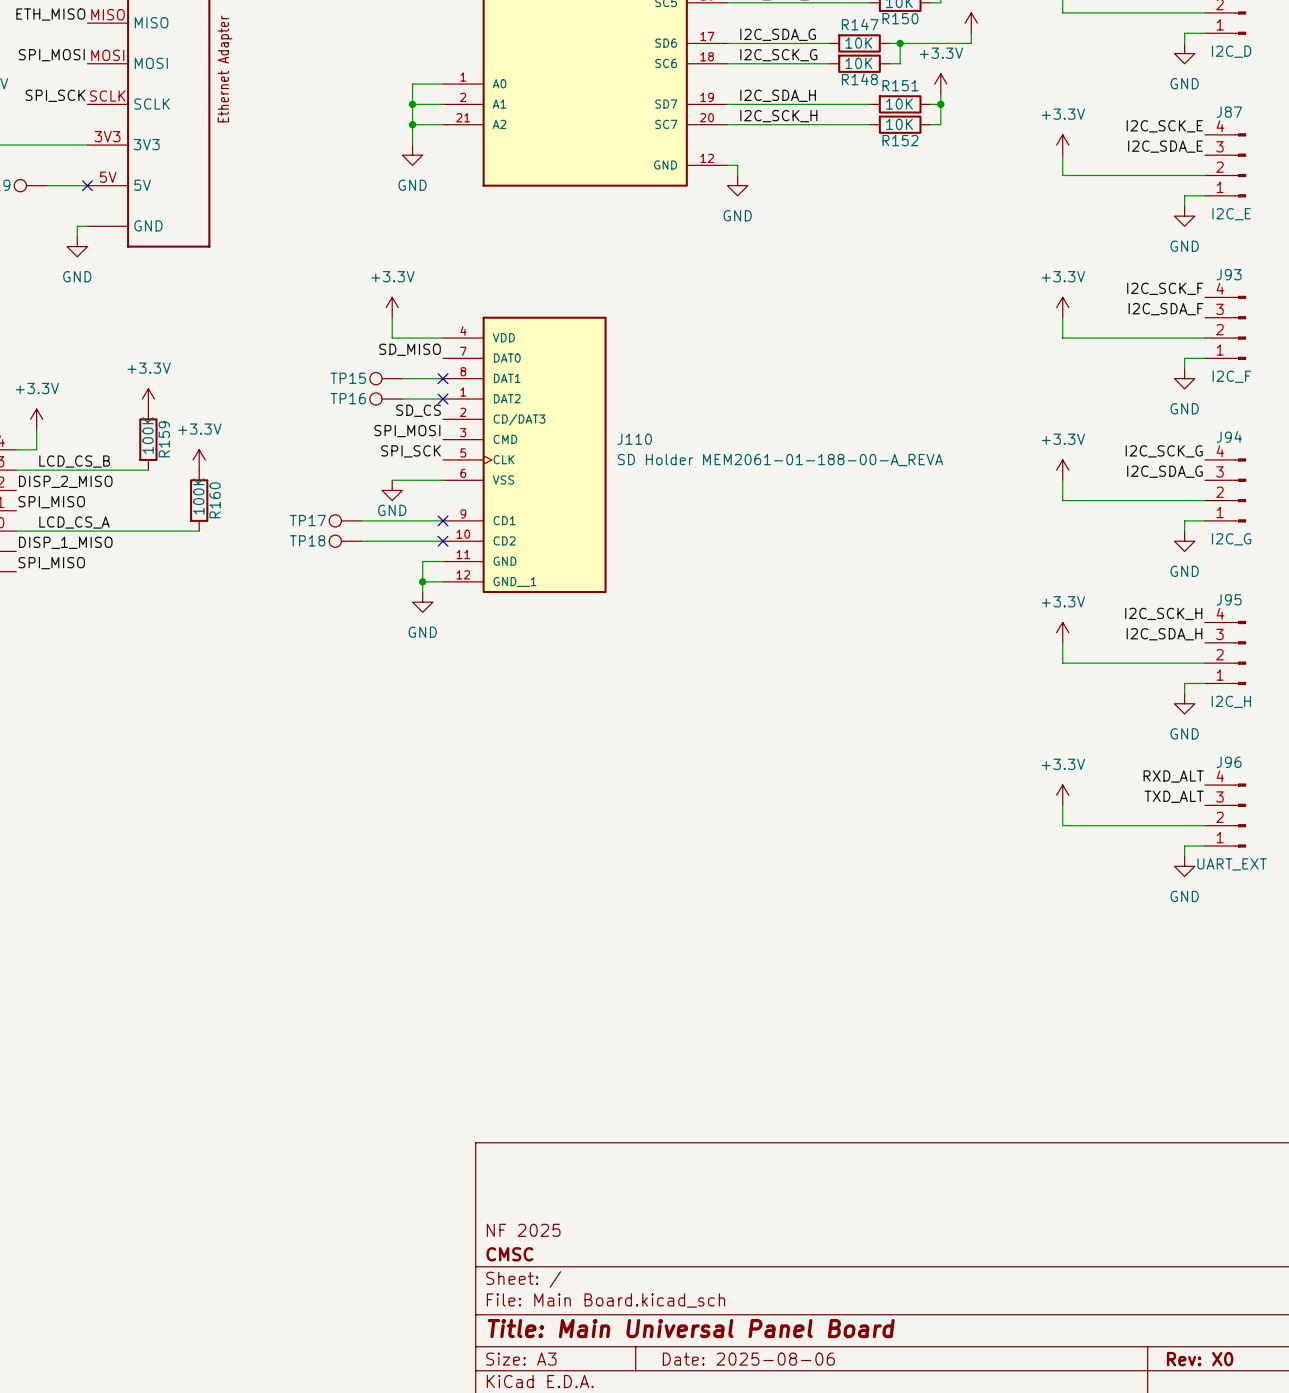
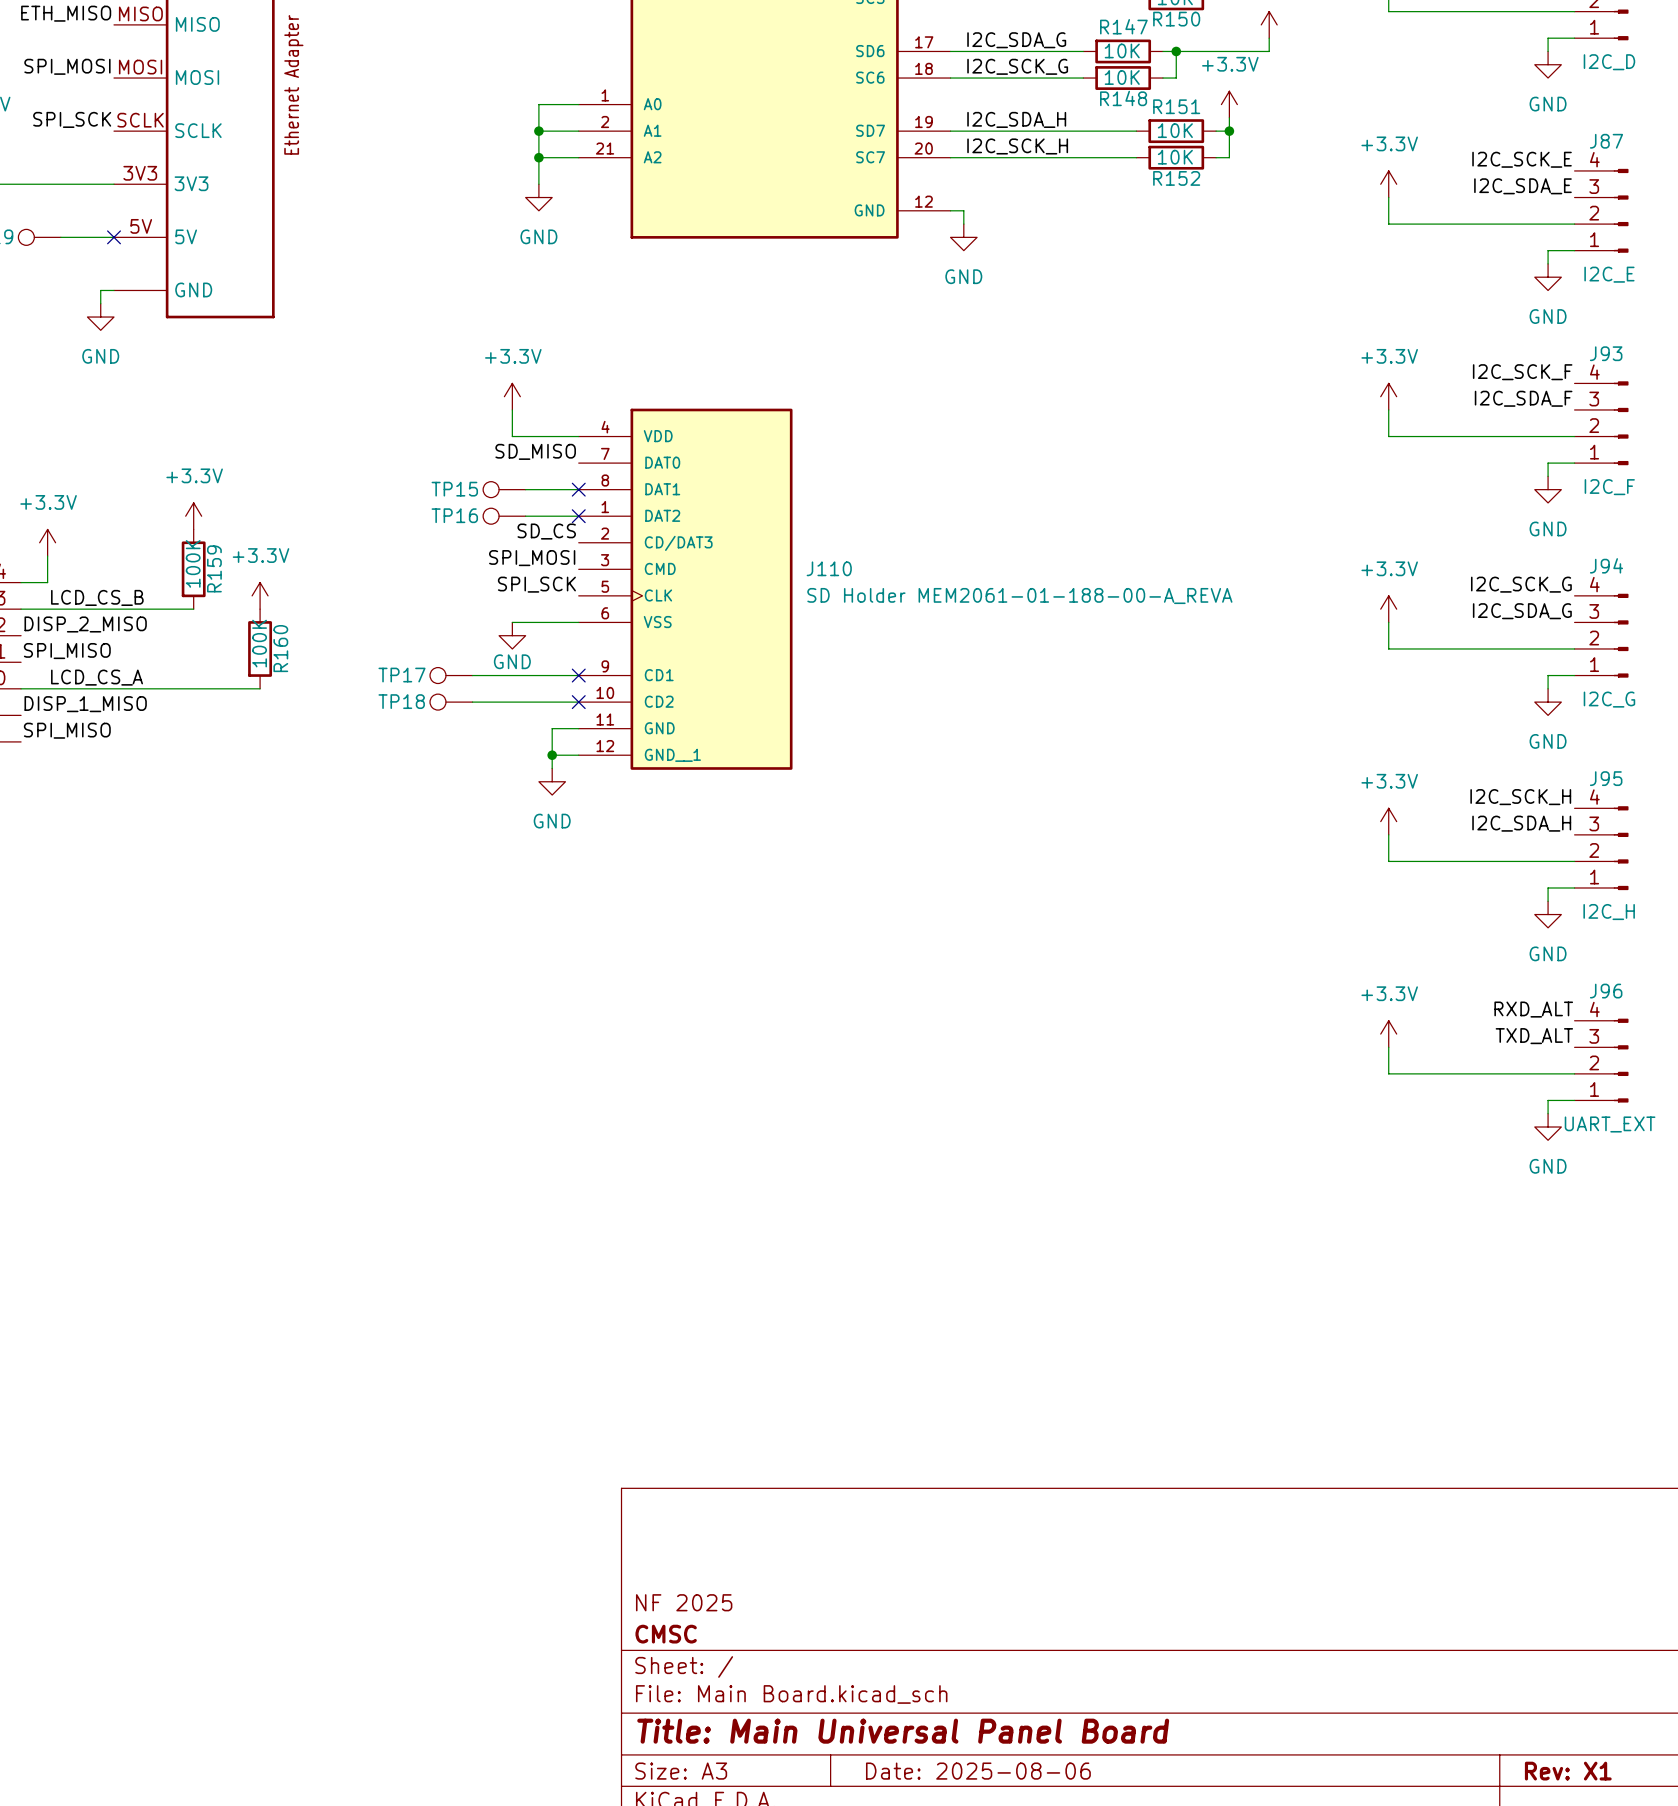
title block: Rev: X0 (1200, 1359) -> Rev: X1 (1568, 1771)

